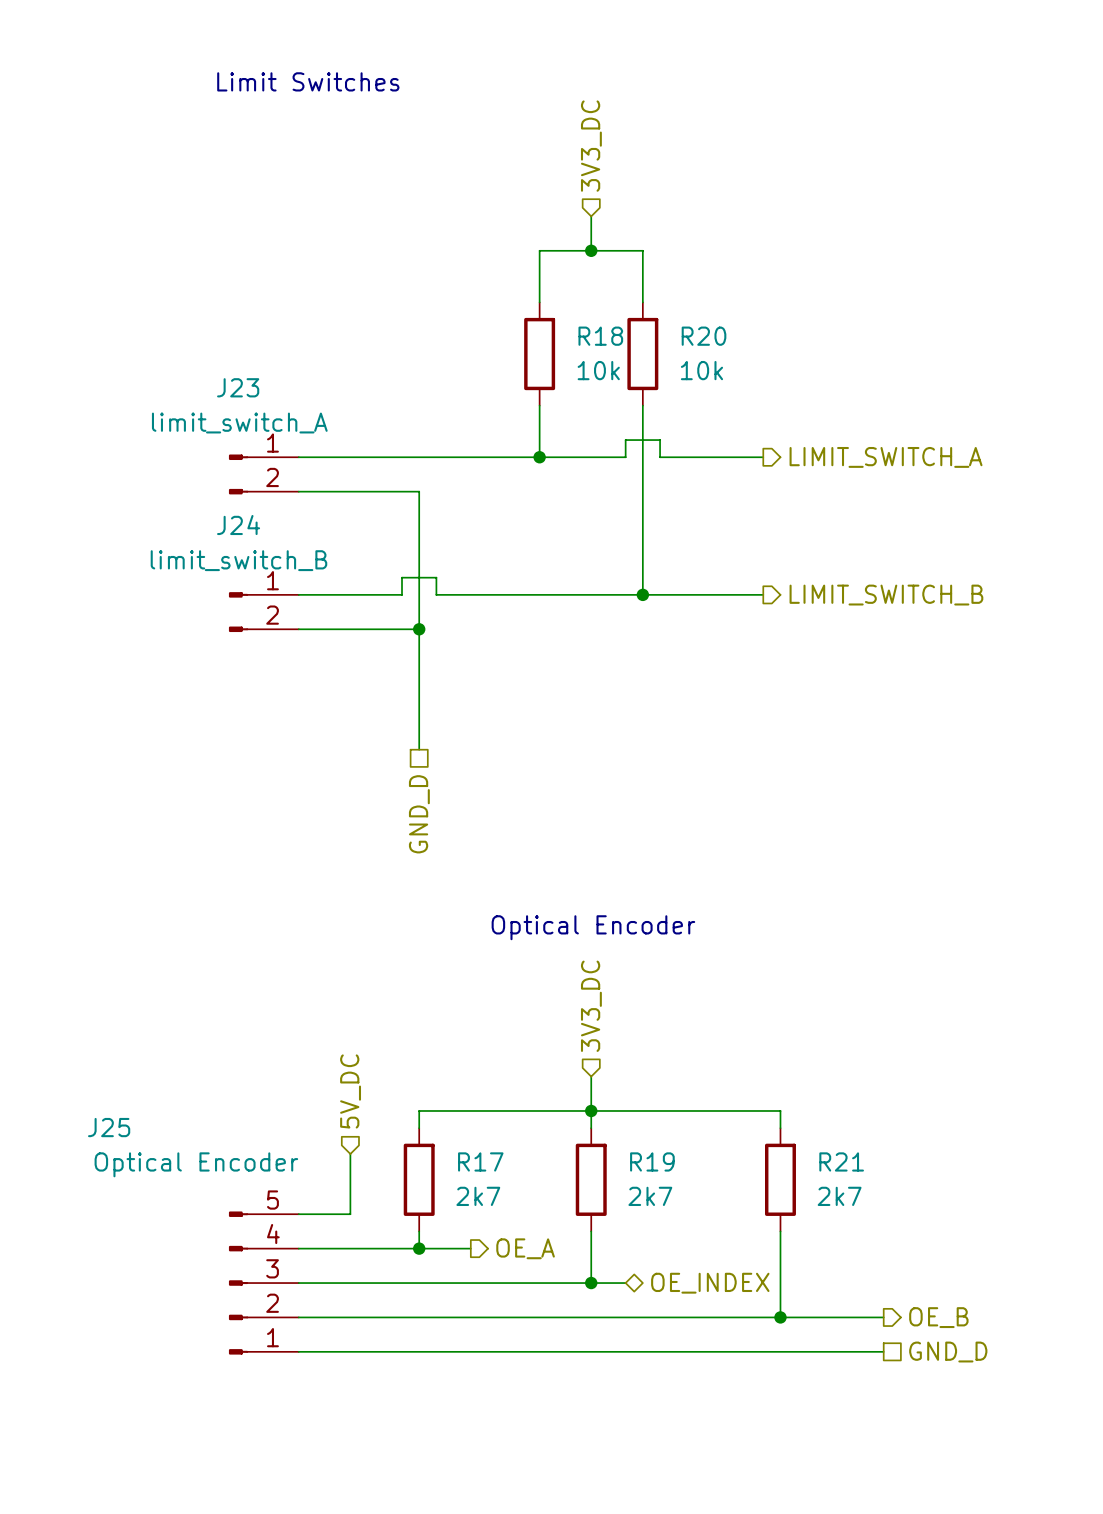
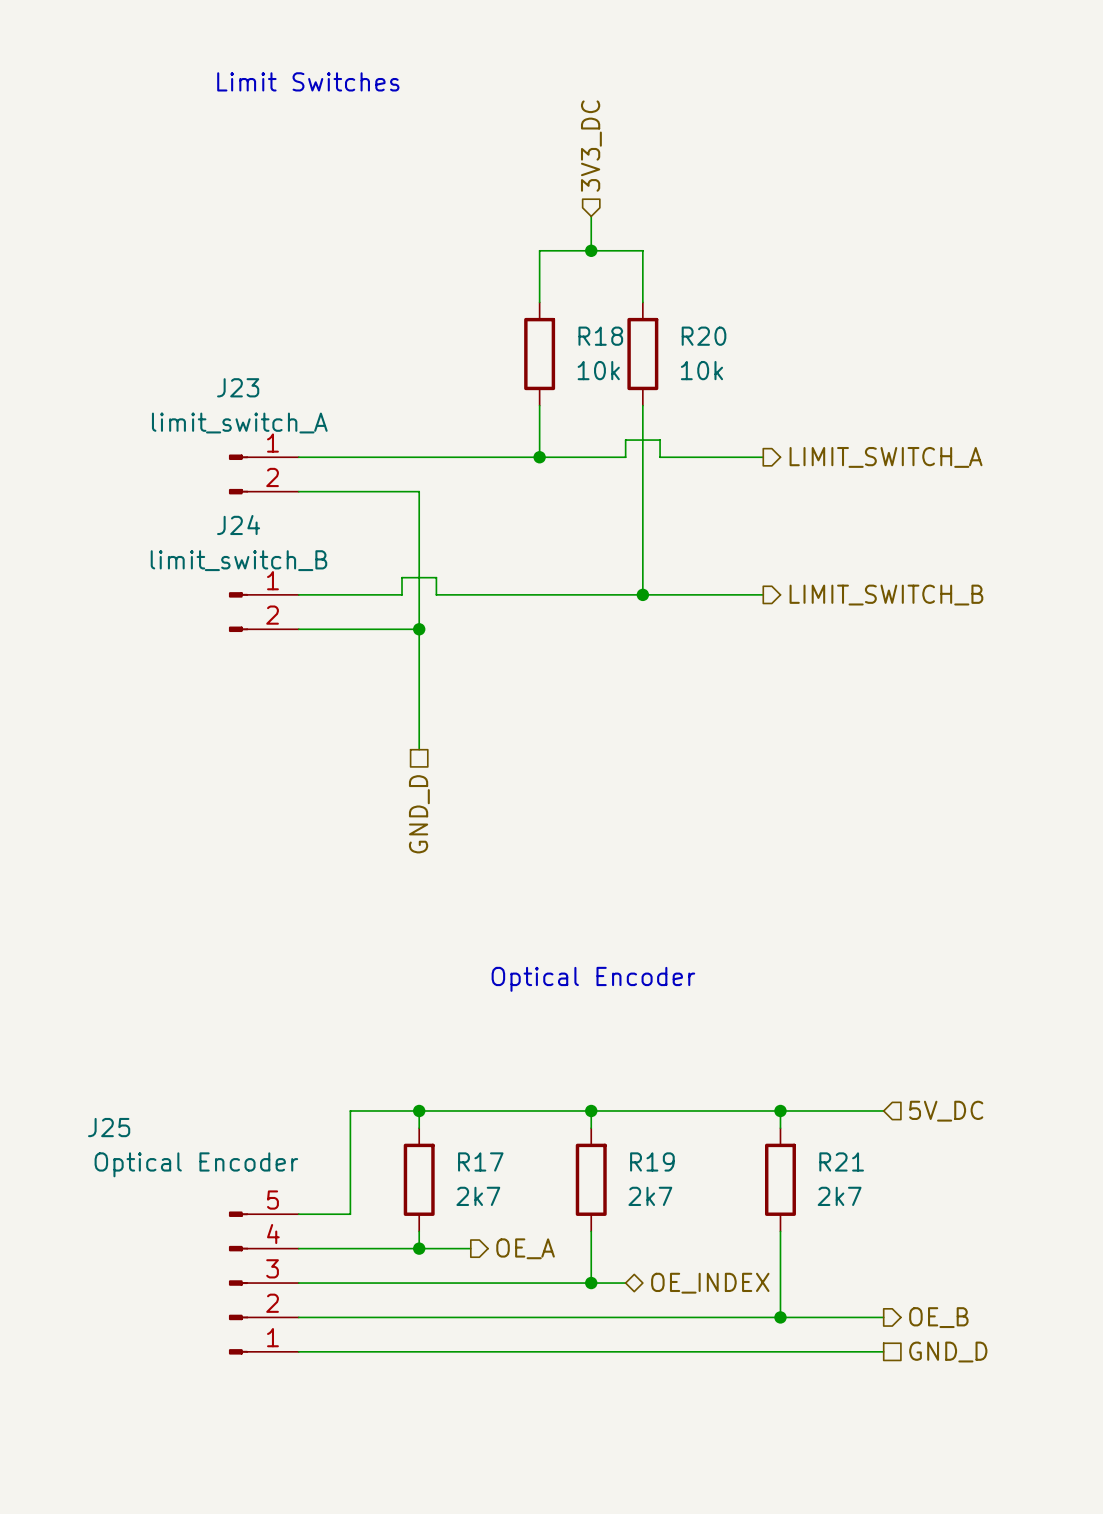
text position: Optical Encoder (593, 927) -> Optical Encoder (593, 979)
hierarchical label: 3V3_DC (591, 1006) -> none
wire: (591, 1076) (591, 1110) -> none
hierarchical label: 5V_DC (350, 1091) -> none
wire: none -> (419, 1110) (350, 1110) (350, 1154)
junction: none -> (419, 1110)
wire: none -> (780, 1110) (883, 1110)
junction: none -> (780, 1110)
hierarchical label: none -> 5V_DC (946, 1111)

